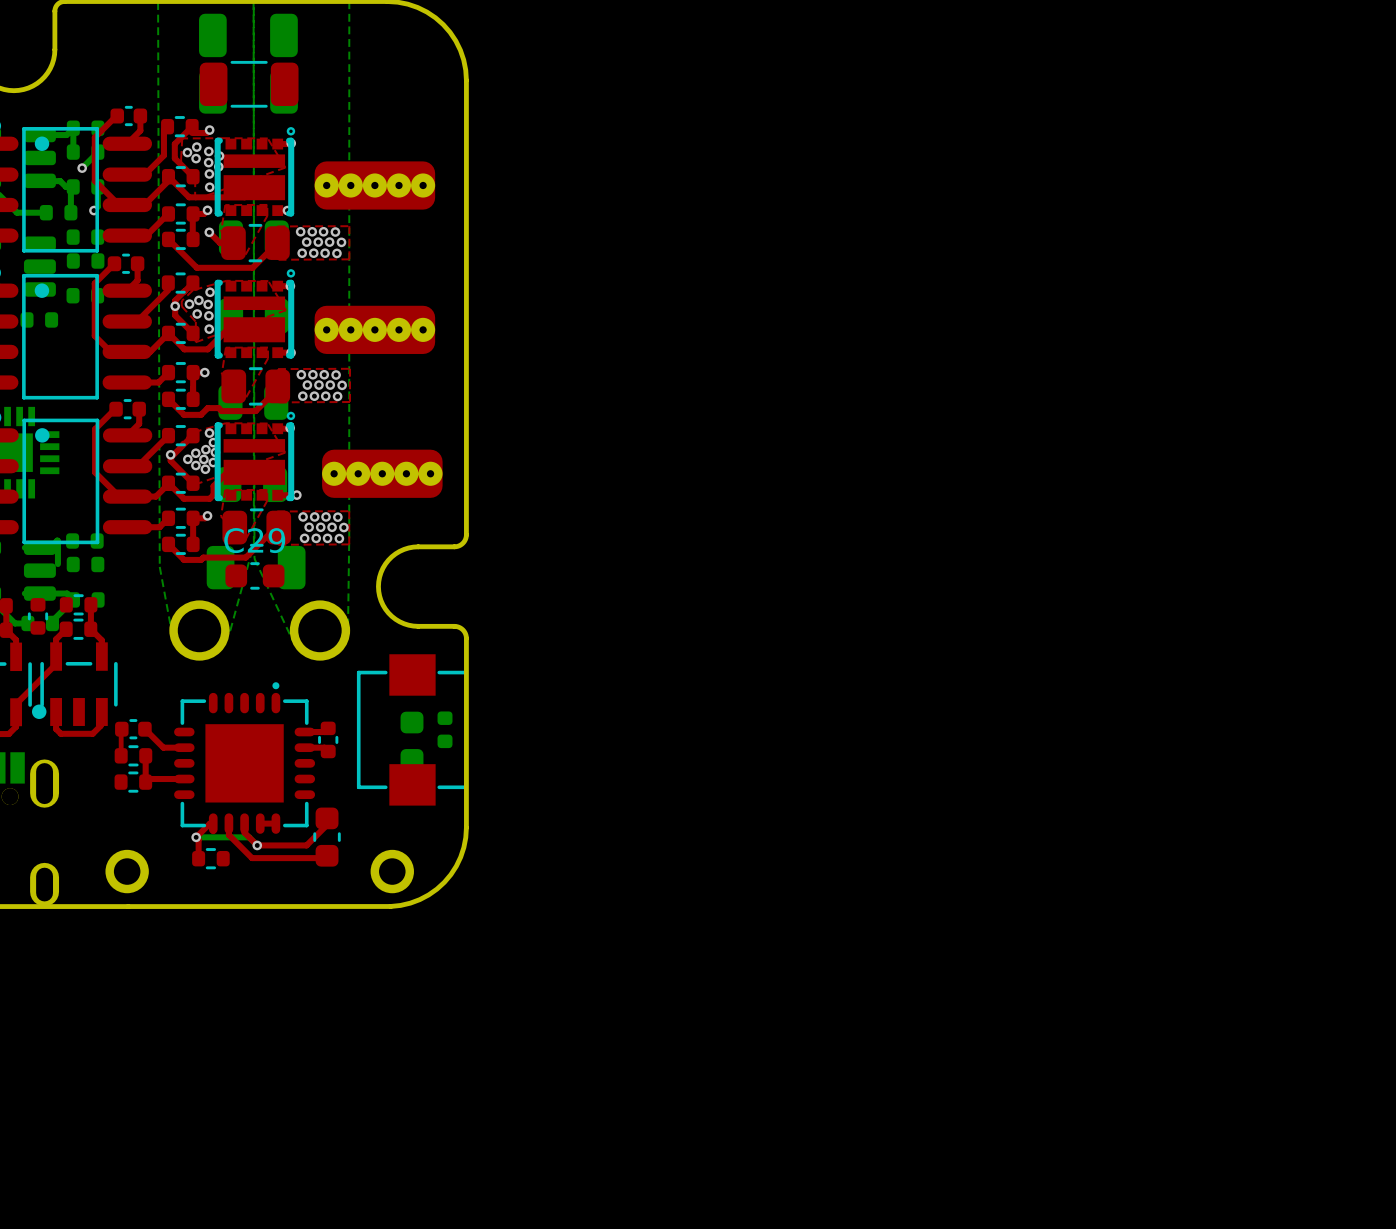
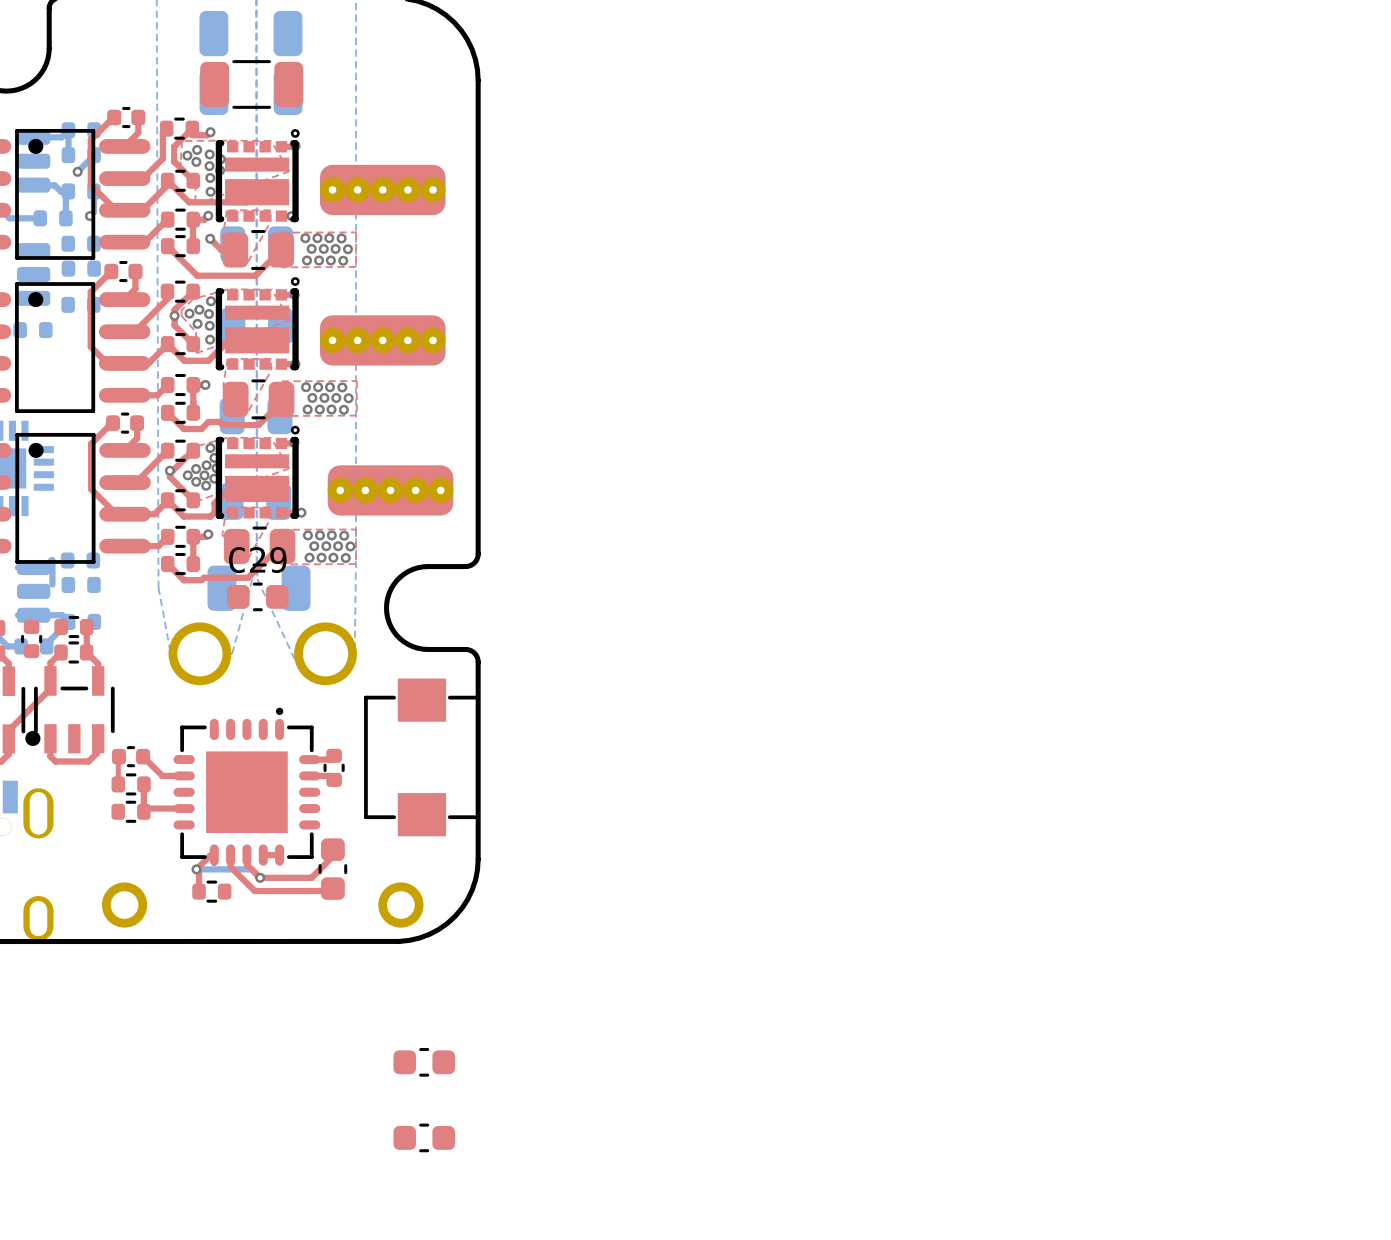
part: (445, 729) -> none
part: (412, 741) -> none
part: none -> (424, 1062)
part: none -> (424, 1137)

